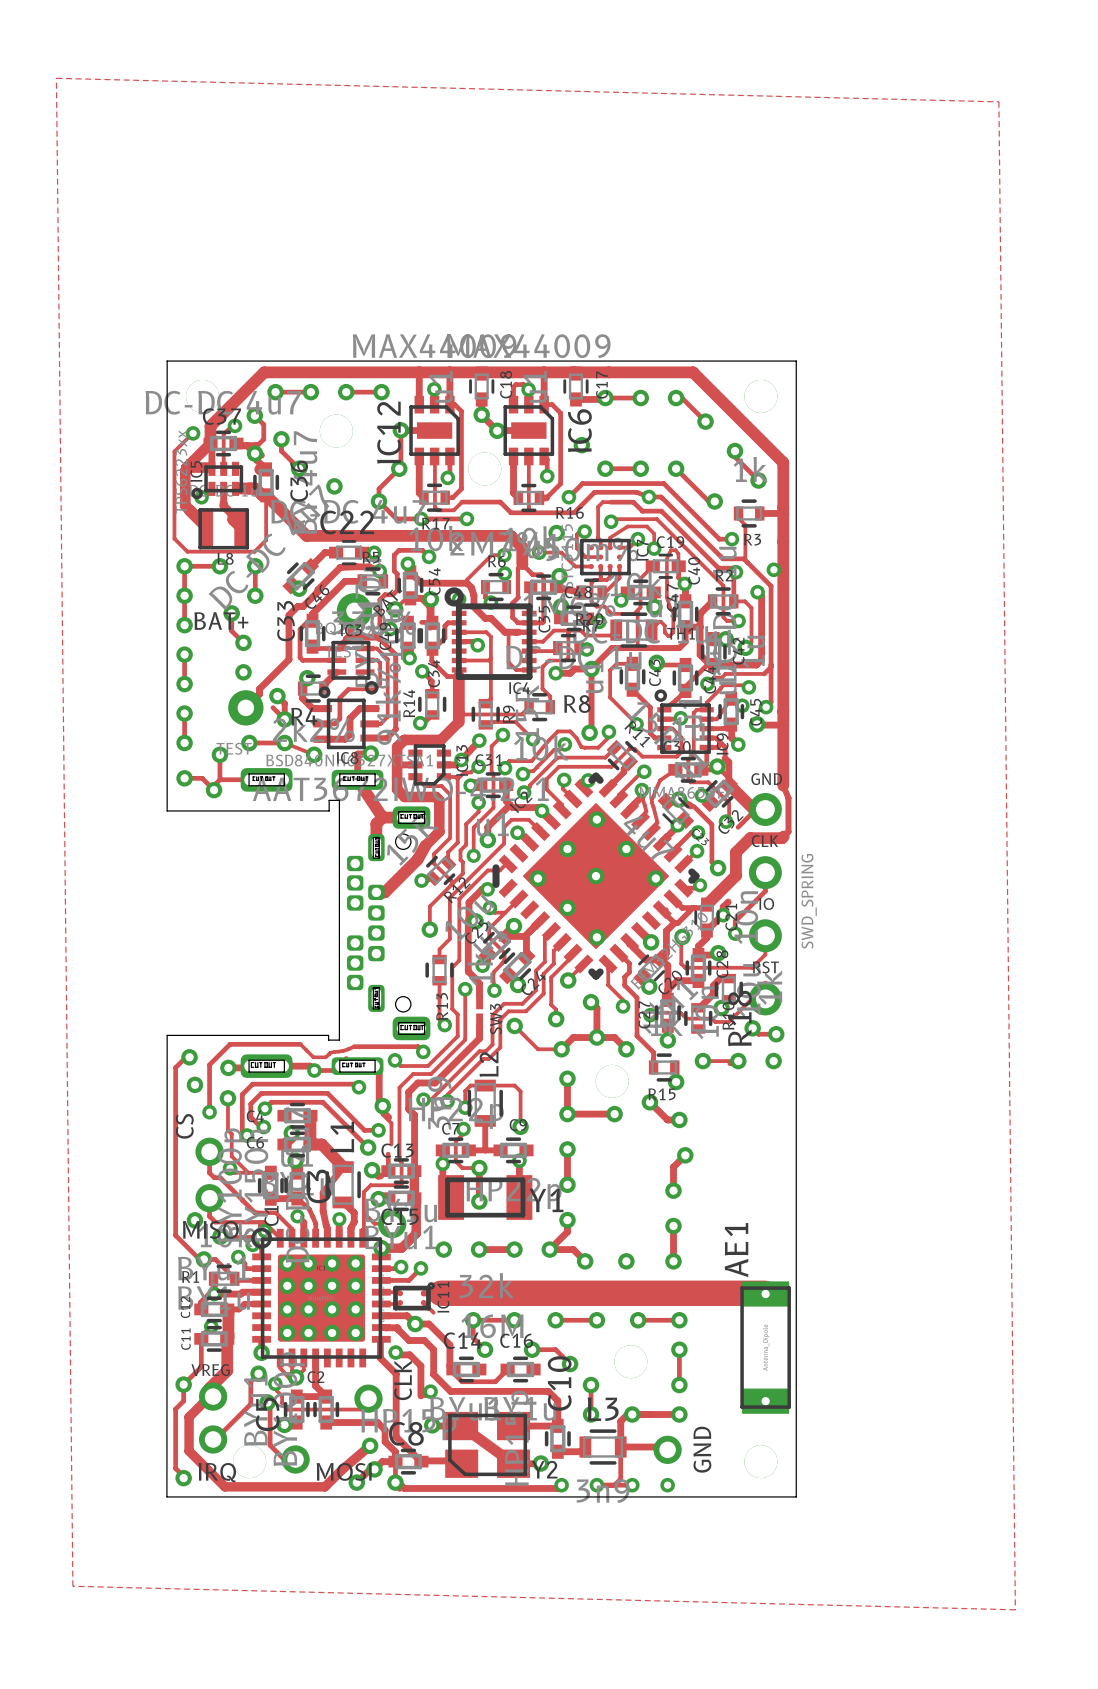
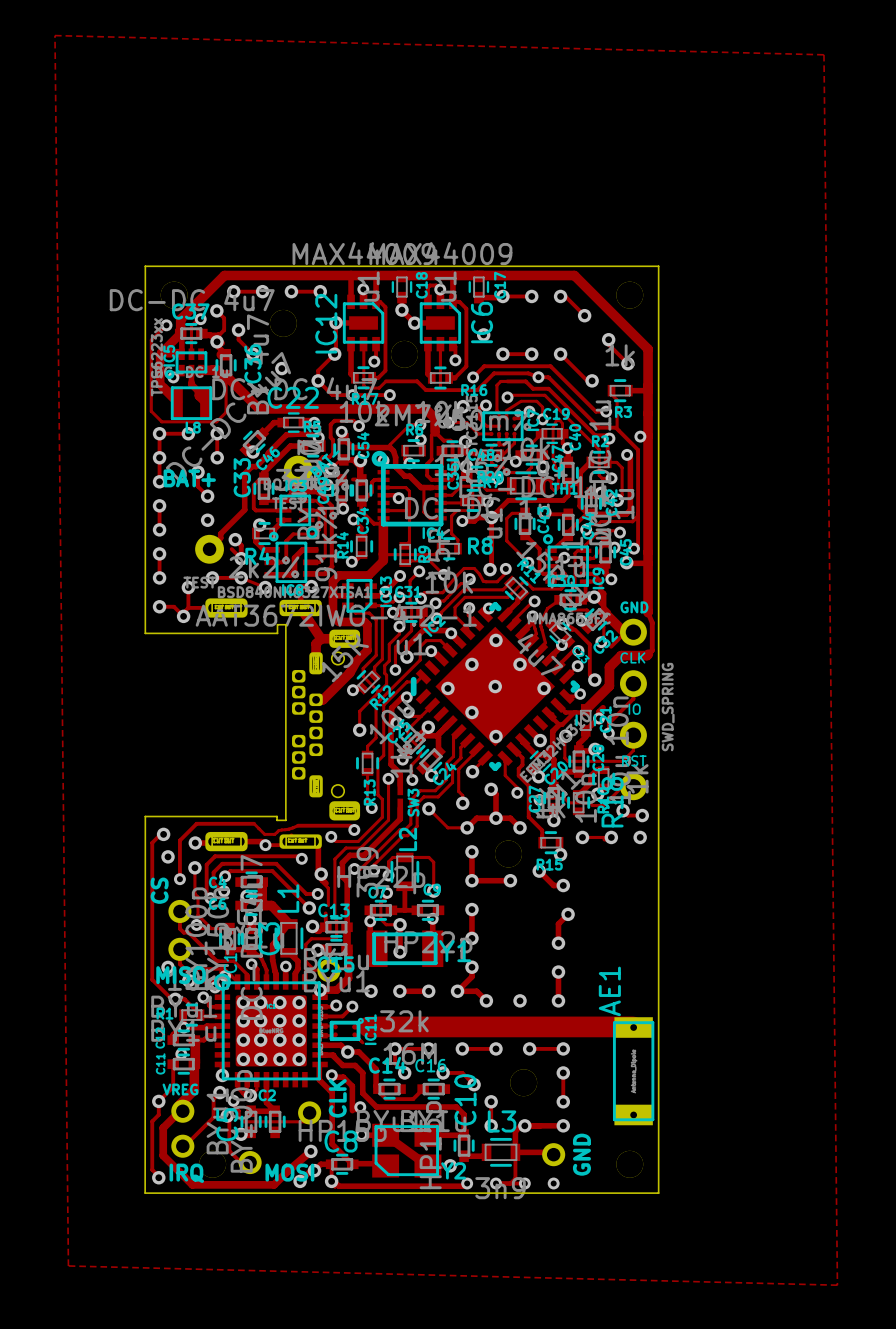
track: (326, 1422) (377, 1422) (385, 1430) (385, 1441) (395, 1451) (395, 1461) -> none

